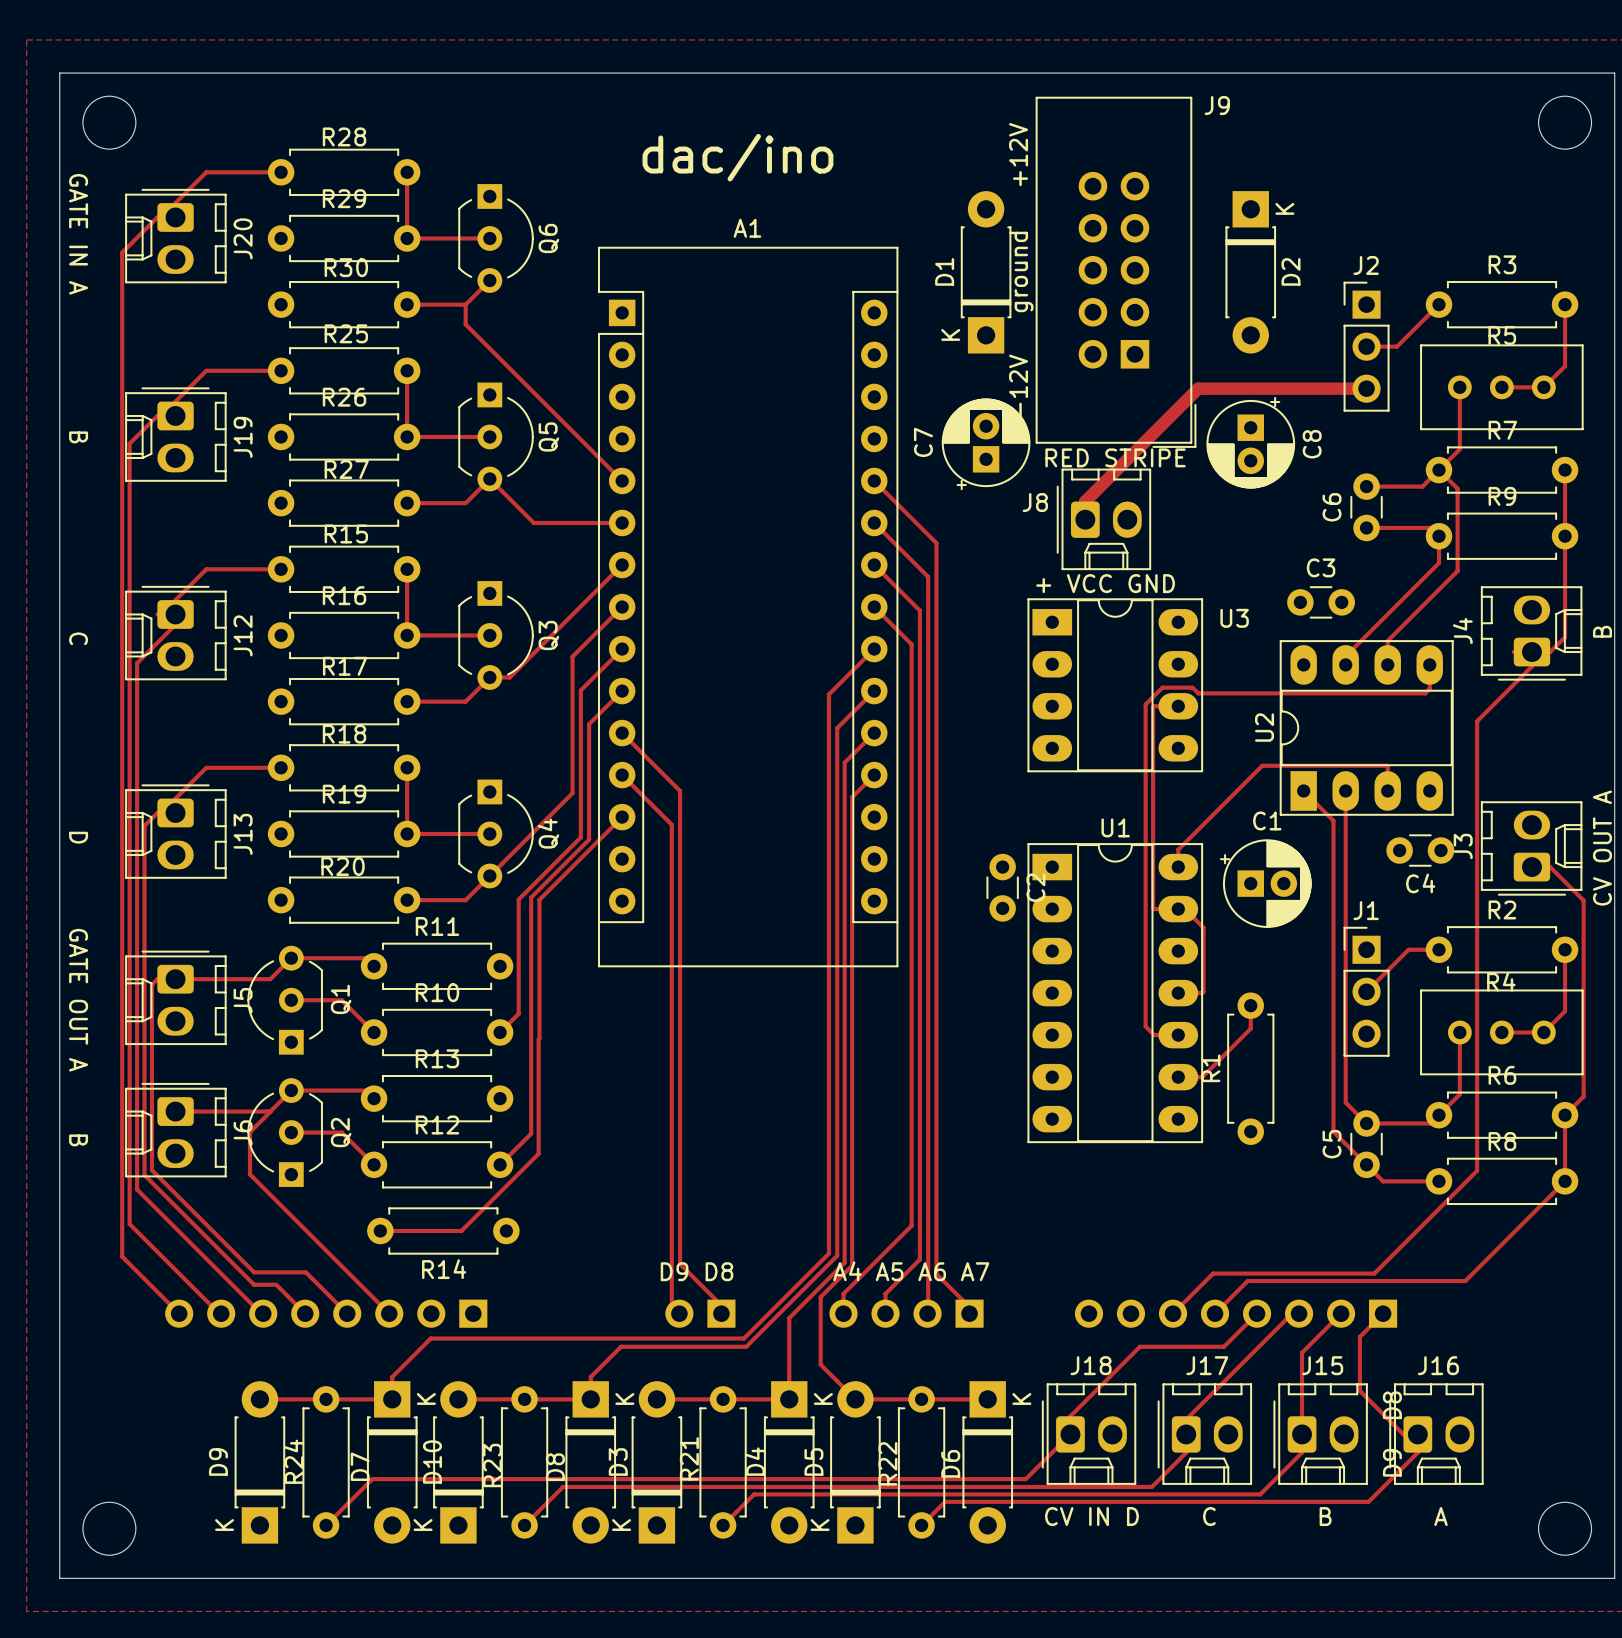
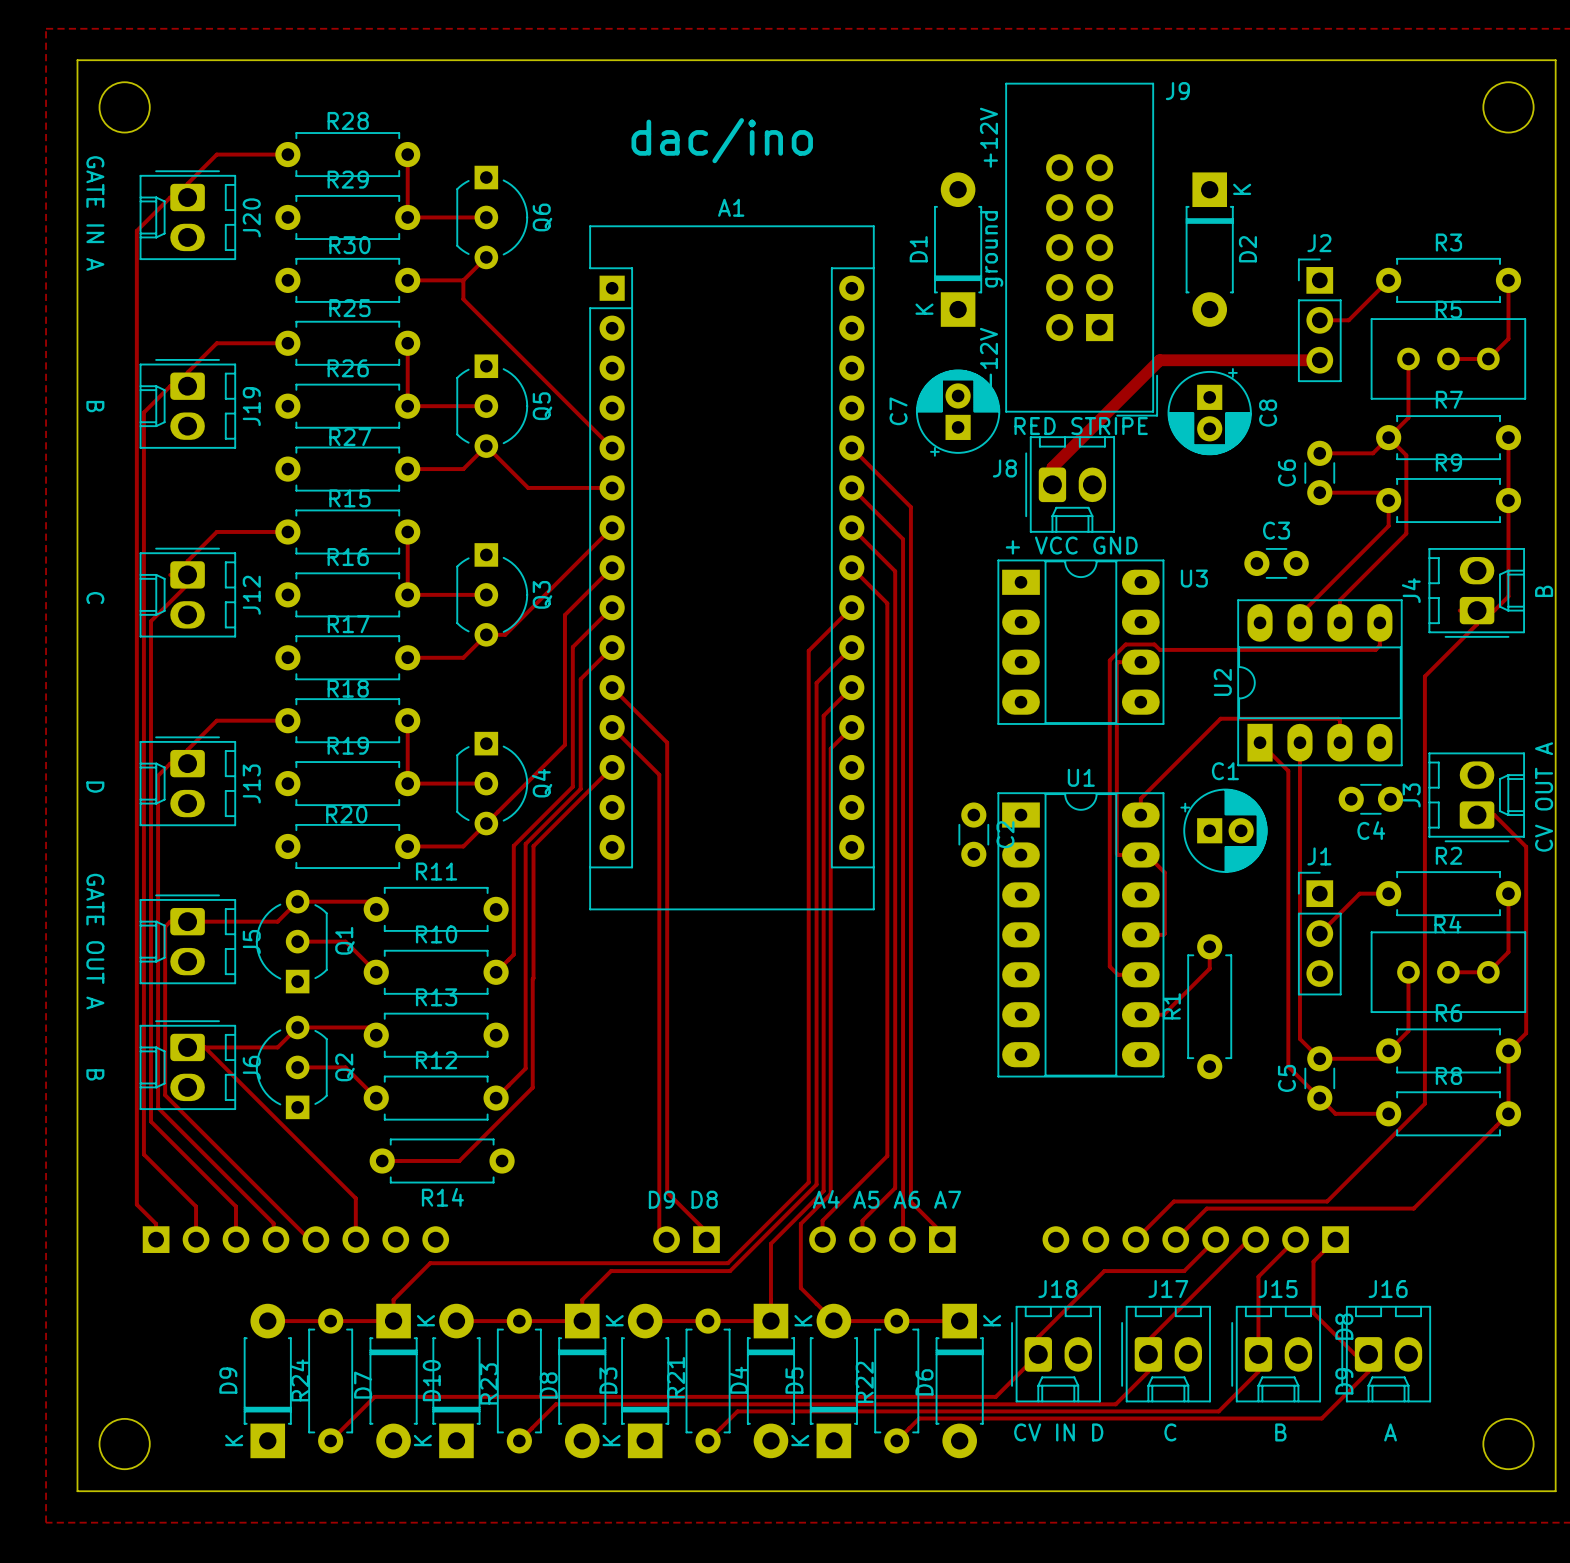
track: none -> (204, 1047) (355, 1198) (355, 1239)
track: (270, 1111) (249, 1132) (249, 1174) (389, 1313) -> none
track: (151, 1161) (151, 1170) (254, 1272) (305, 1272) (347, 1313) -> (165, 1095) (309, 1239)
track: (122, 1256) (179, 1313) -> (136, 1185) (136, 1204) (156, 1223) (156, 1239)
track: (184, 1278) (221, 1313) -> (196, 1206) (196, 1239)
track: (226, 1278) (263, 1313) -> (235, 1206) (235, 1239)
track: (254, 1284) (276, 1284) (305, 1313) -> (262, 1212) (273, 1223) (273, 1237)
part rotation: 0° (326, 1313) -> 180° (295, 1239)

